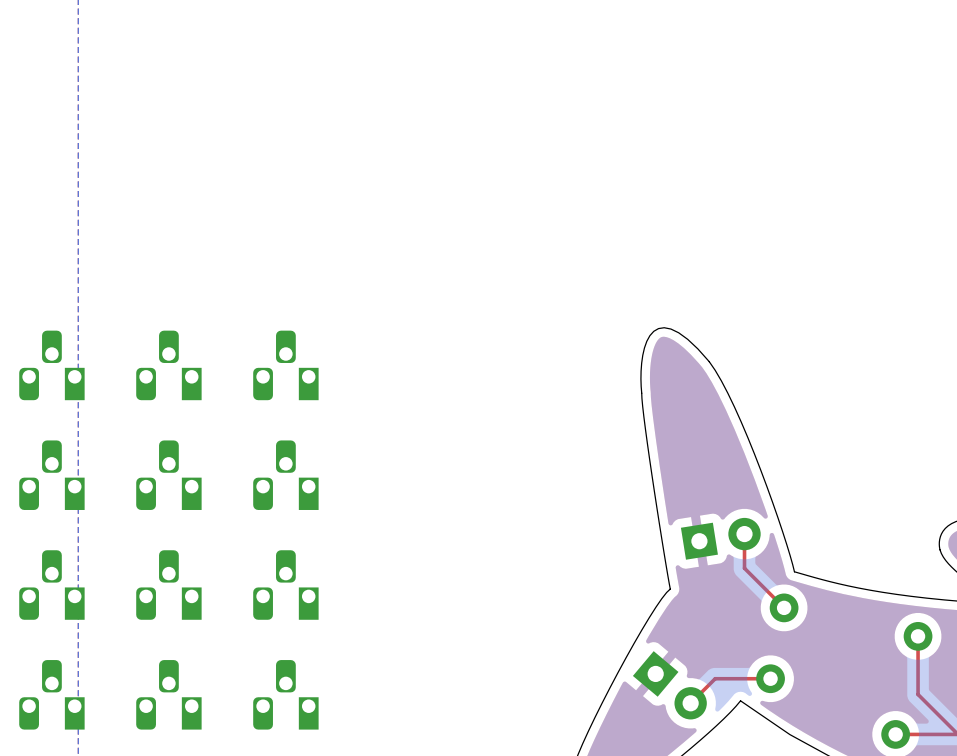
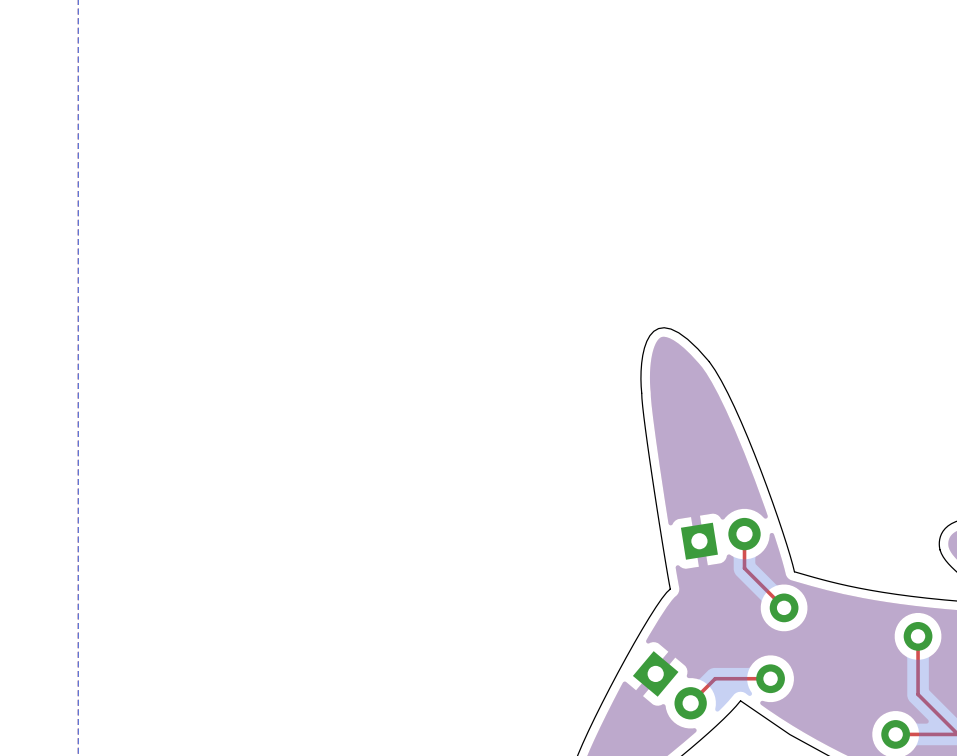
part: (51, 365) -> none
part: (168, 365) -> none
part: (285, 365) -> none
part: (51, 475) -> none
part: (168, 475) -> none
part: (285, 475) -> none
part: (51, 585) -> none
part: (168, 585) -> none
part: (285, 585) -> none
part: (51, 694) -> none
part: (168, 694) -> none
part: (285, 694) -> none

